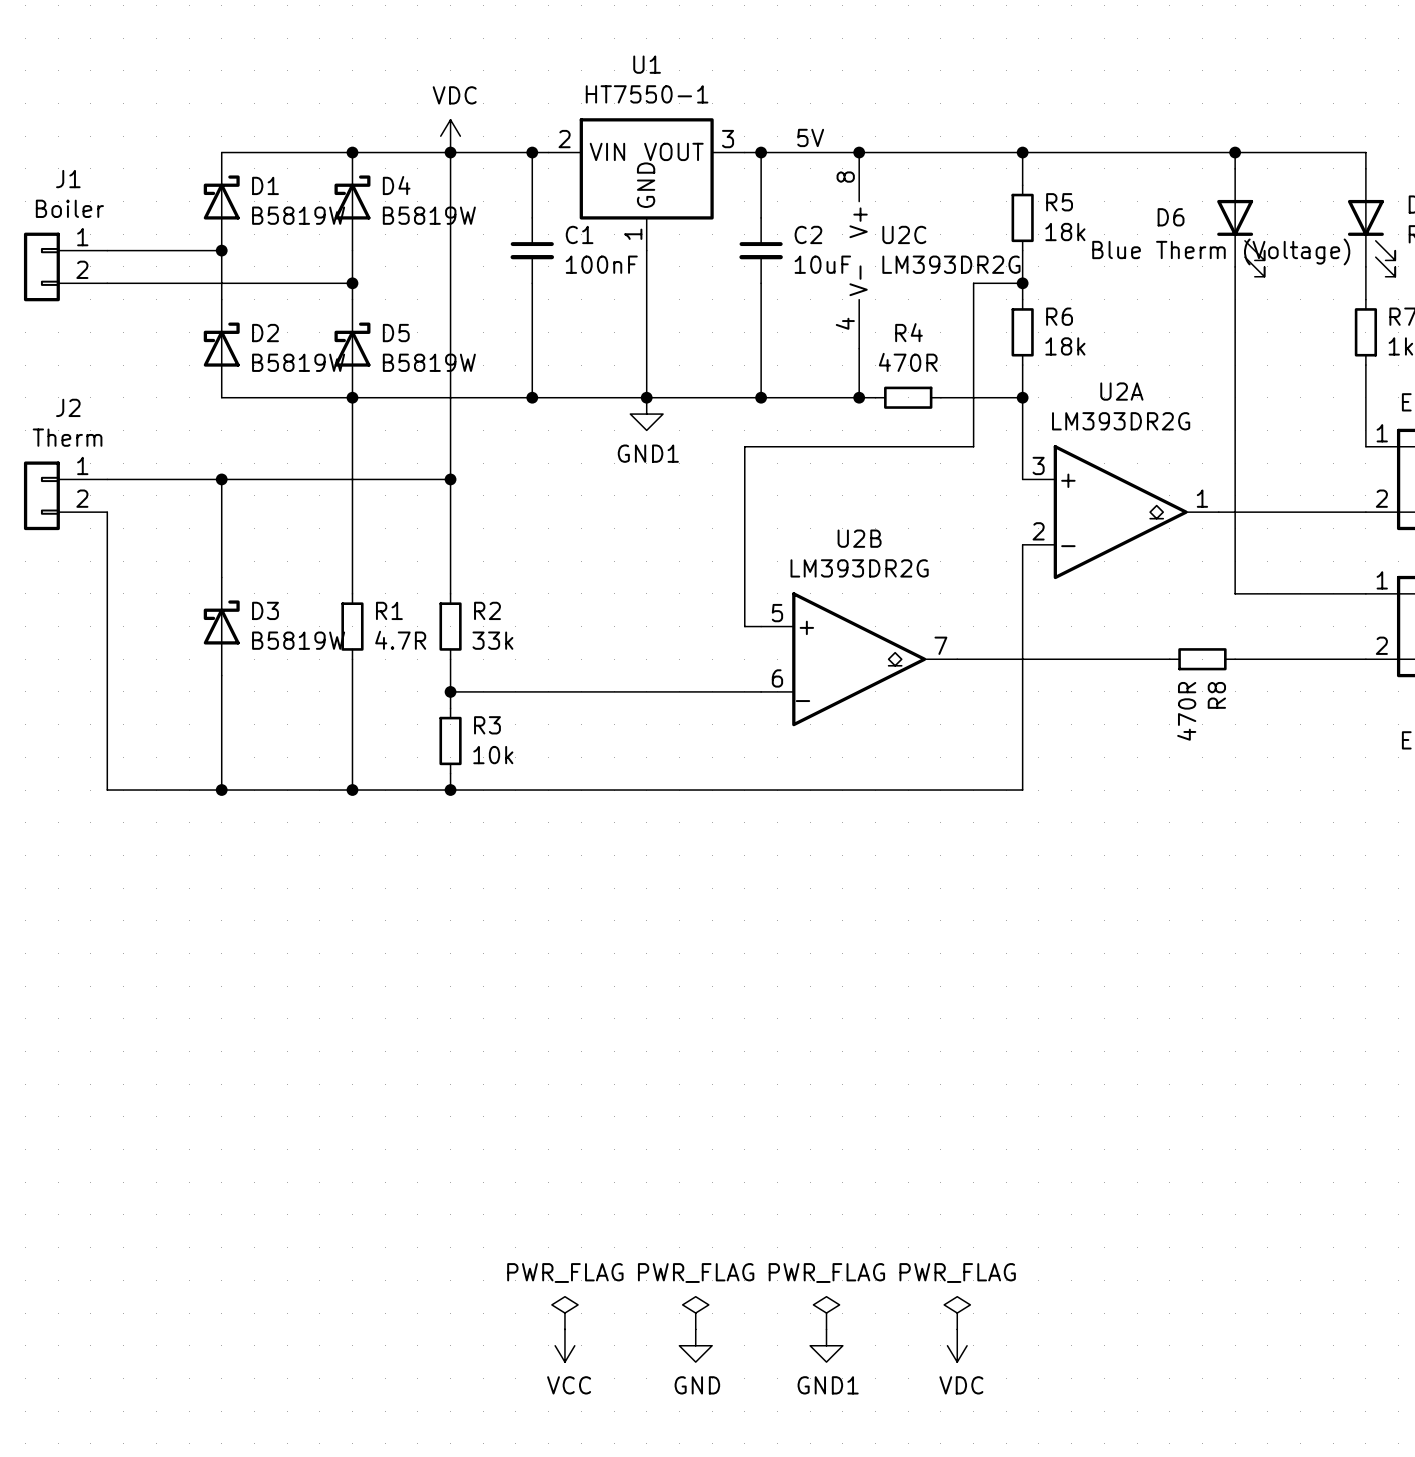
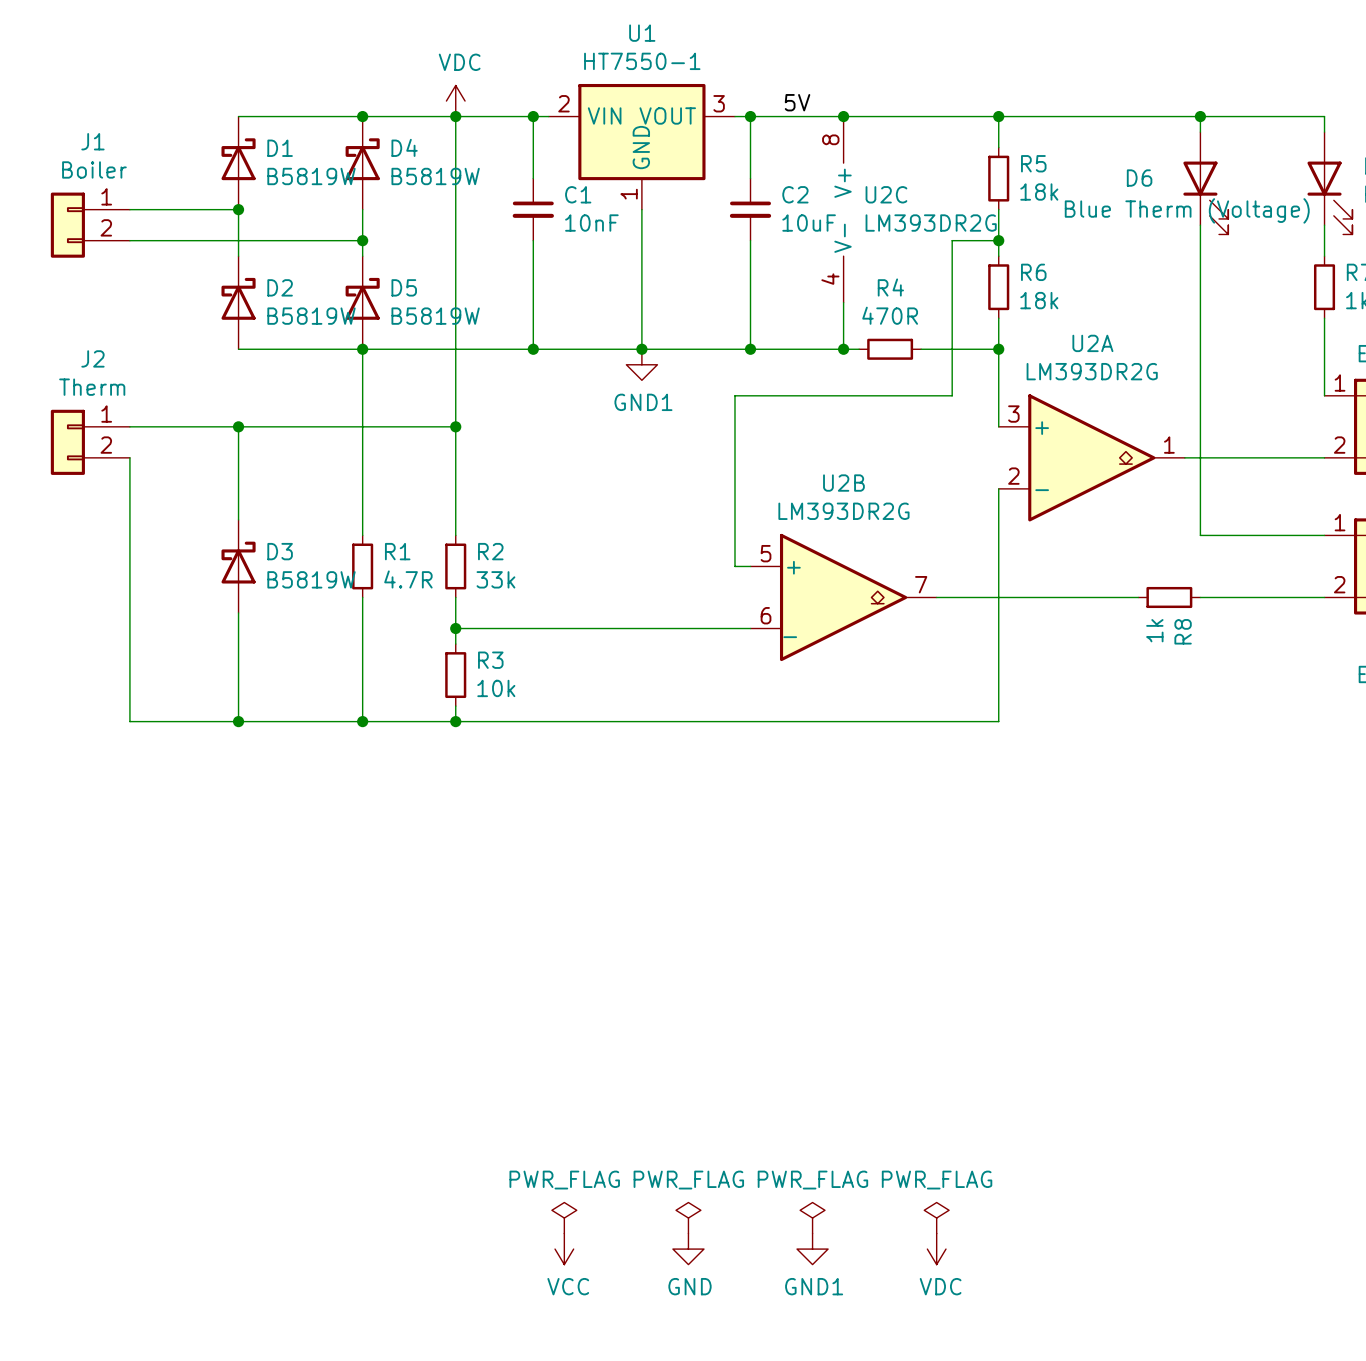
C1 value: 100nF (601, 264) -> 10nF (591, 223)
R8 value: 470R (1186, 711) -> 1k (1154, 630)

